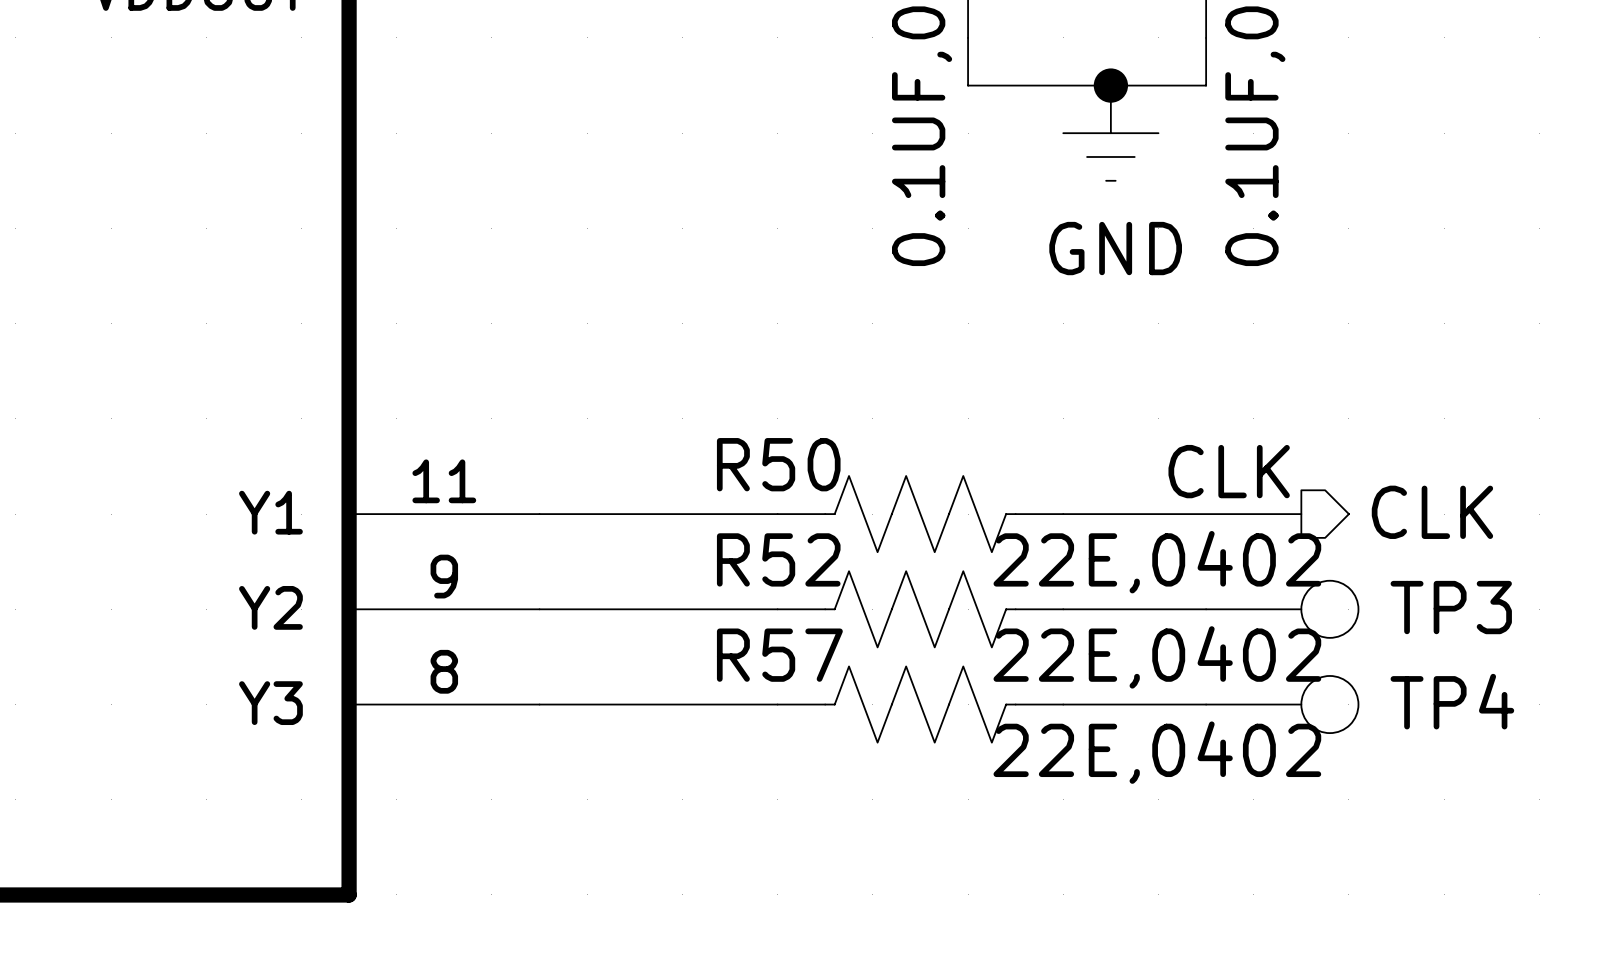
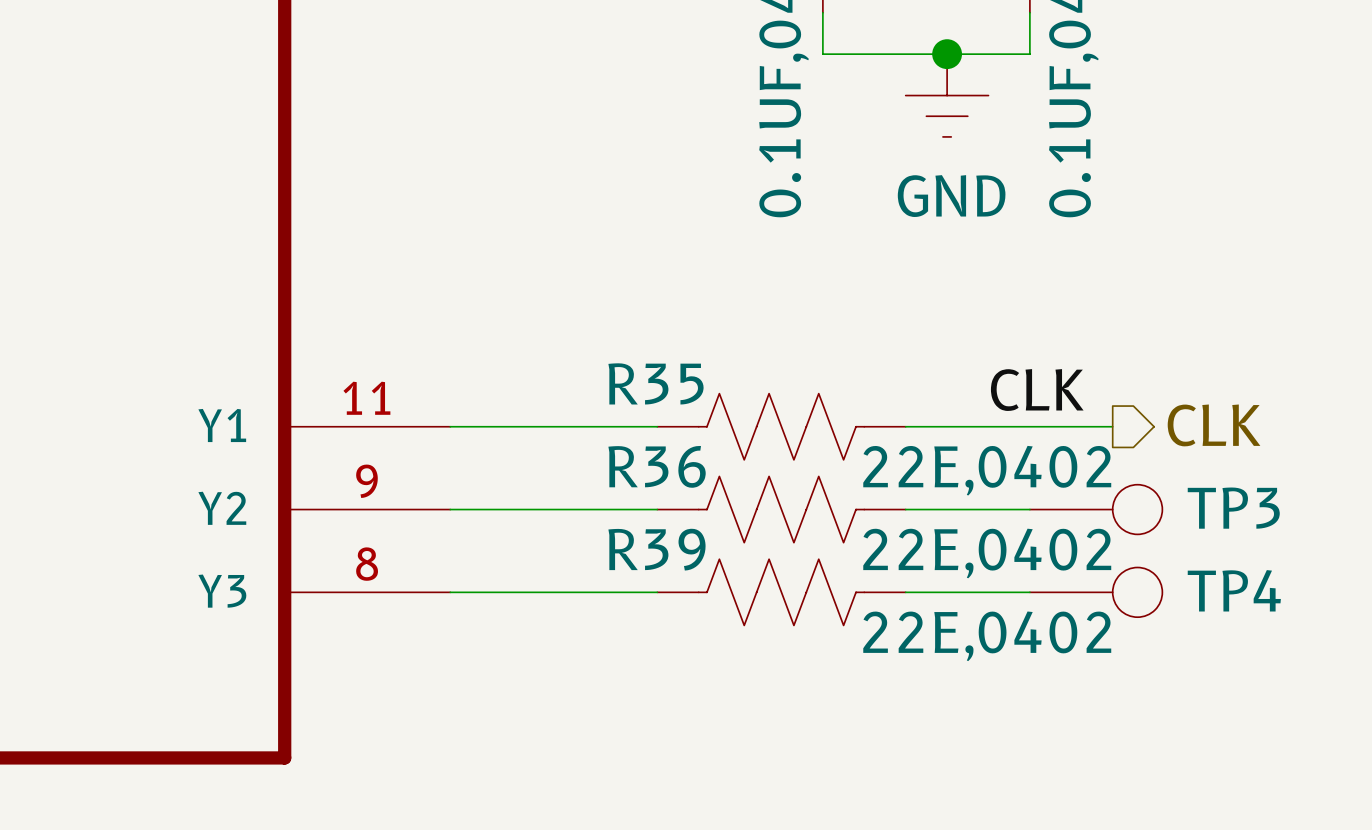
R50 name: R50 (778, 464) -> R35 (655, 383)
R52 name: R52 (778, 559) -> R36 (657, 466)
R57 name: R57 (779, 655) -> R39 (656, 549)

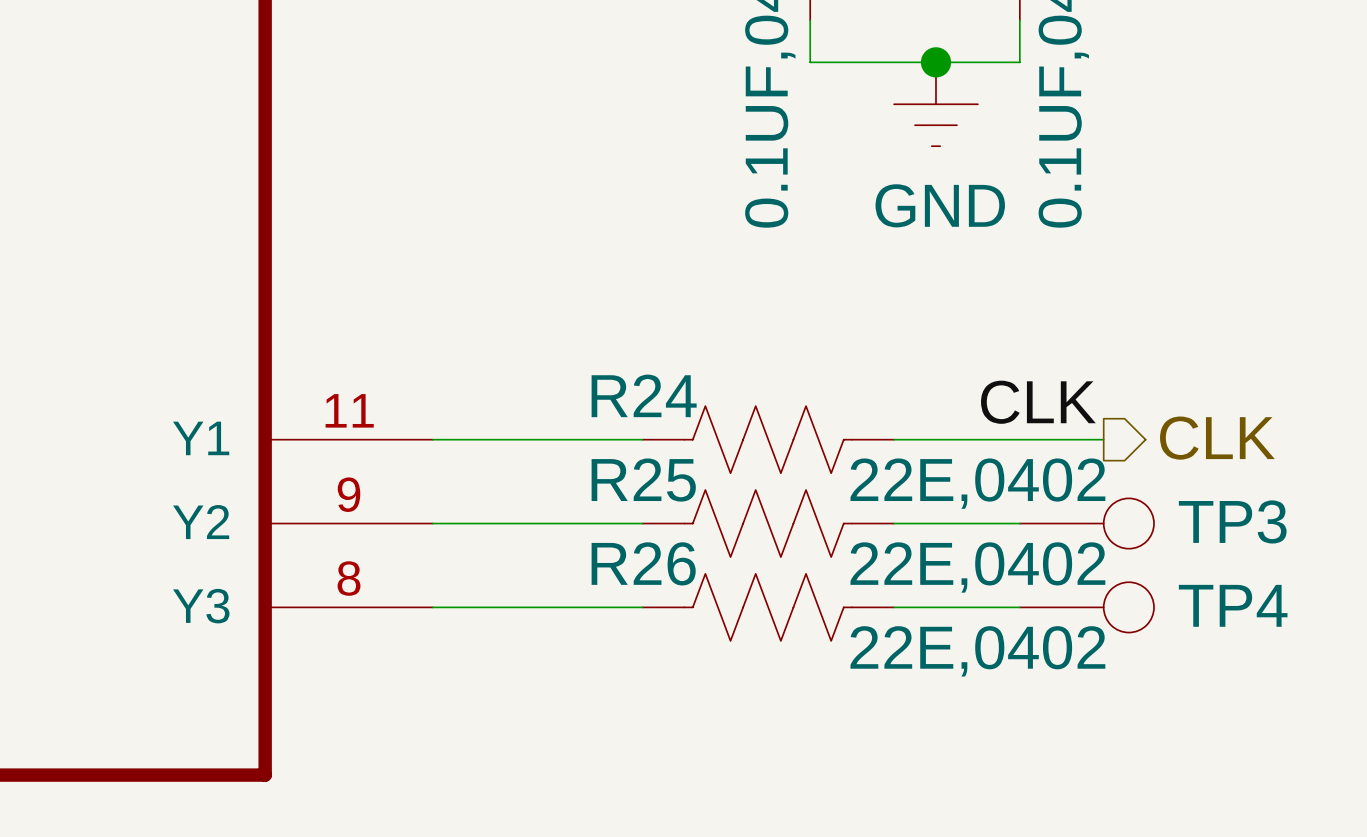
R35 name: R35 (655, 383) -> R24 (644, 395)
R36 name: R36 (657, 466) -> R25 (643, 480)
R39 name: R39 (656, 549) -> R26 (643, 563)

